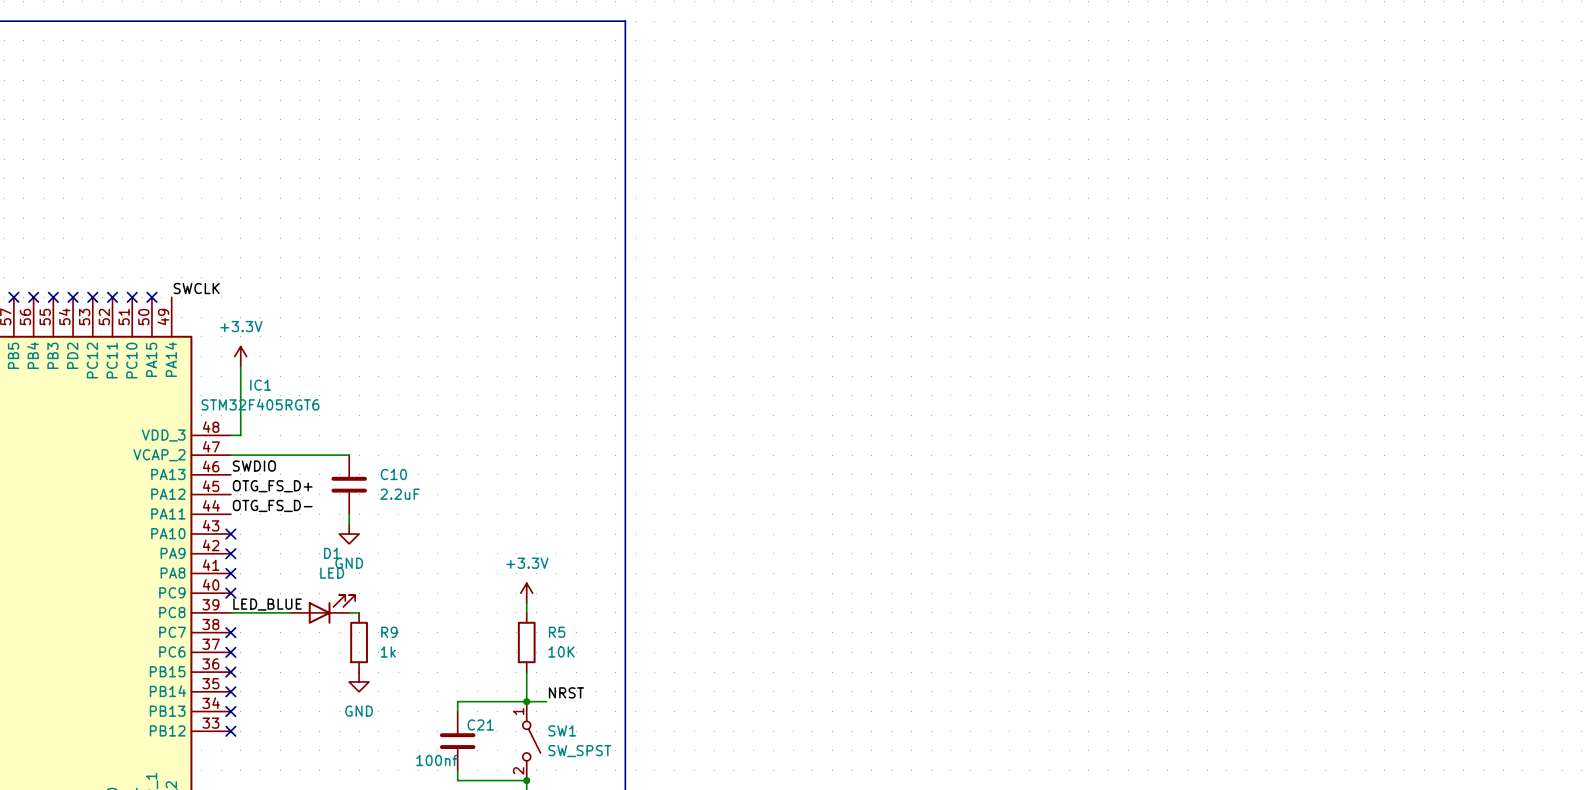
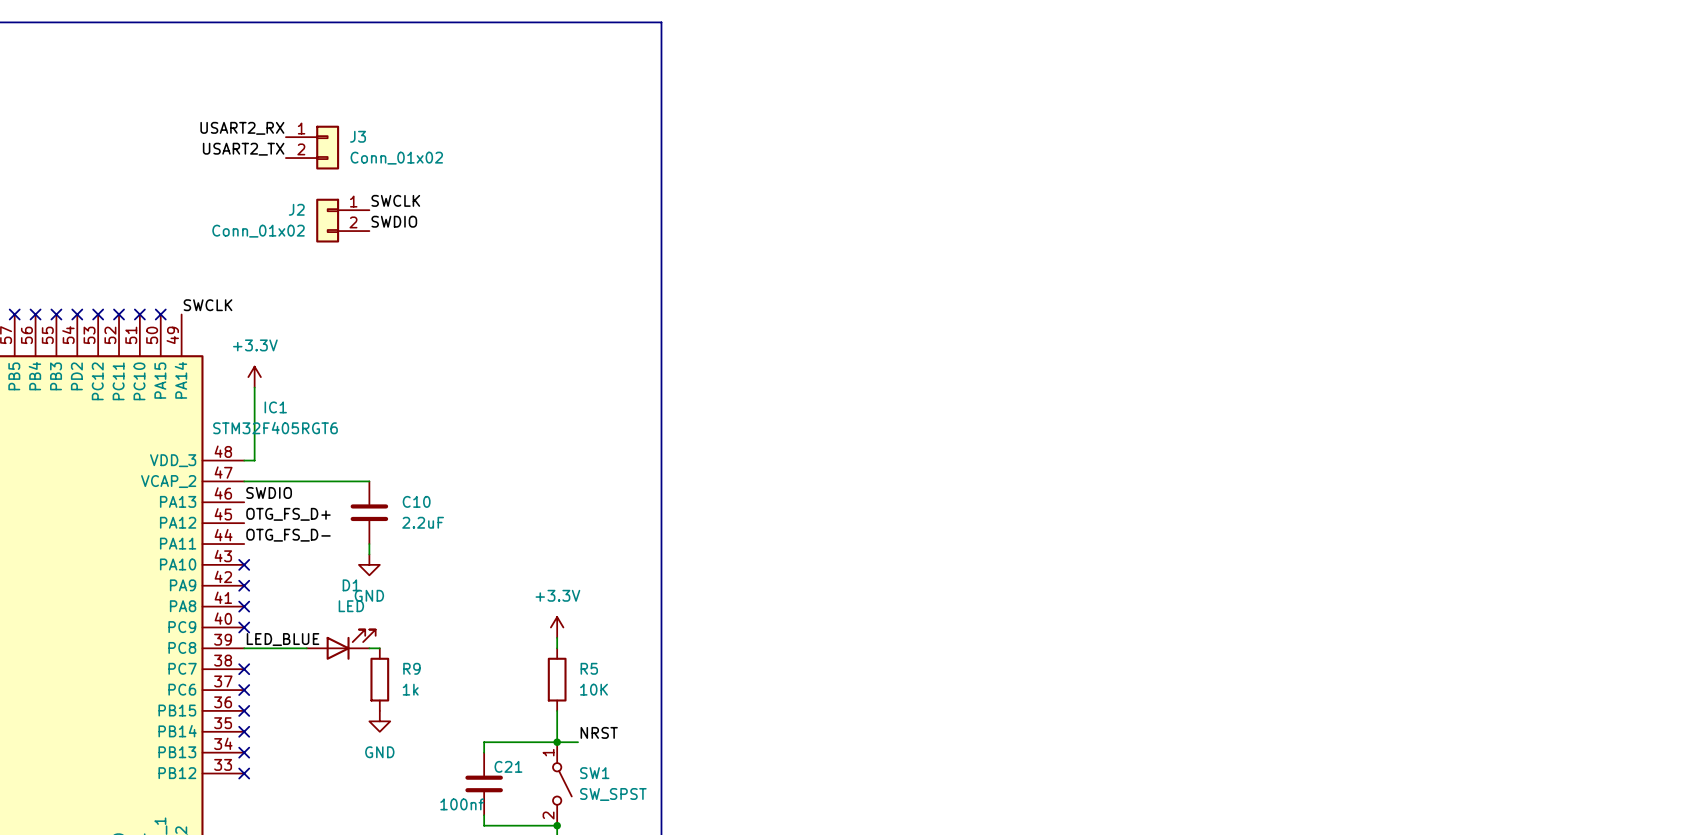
label: none -> USART2_RX (242, 128)
J3: none -> Conn_01x02 (312, 147)
label: none -> USART2_TX (243, 149)
label: none -> SWCLK (395, 200)
J2: none -> Conn_01x02 (342, 220)
label: none -> SWDIO (394, 221)

